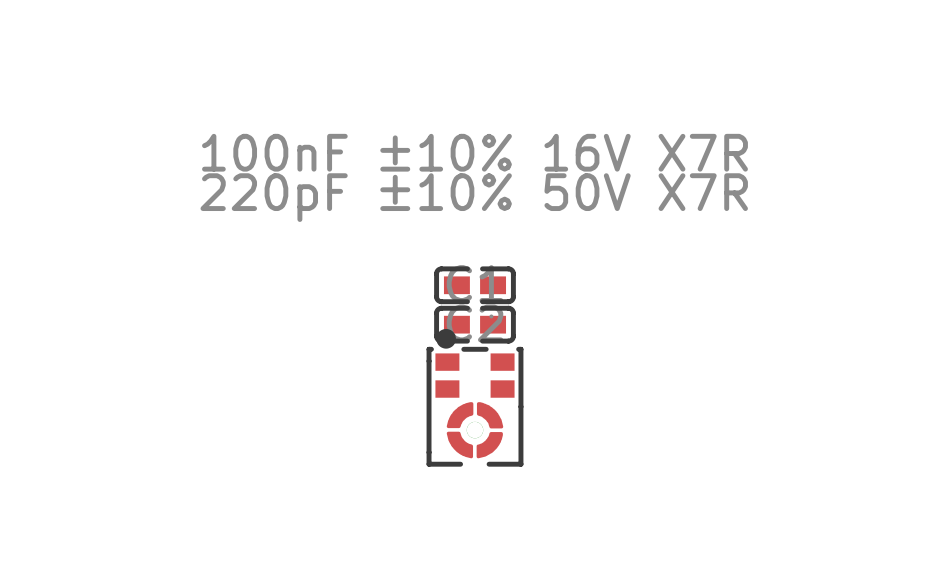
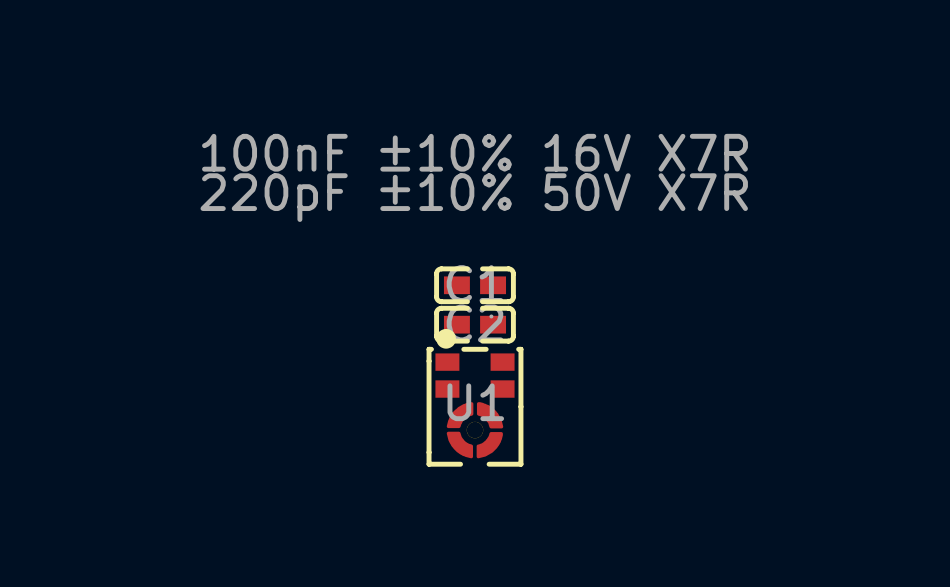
part: (474, 397) -> none
U1: none -> (474, 397)

